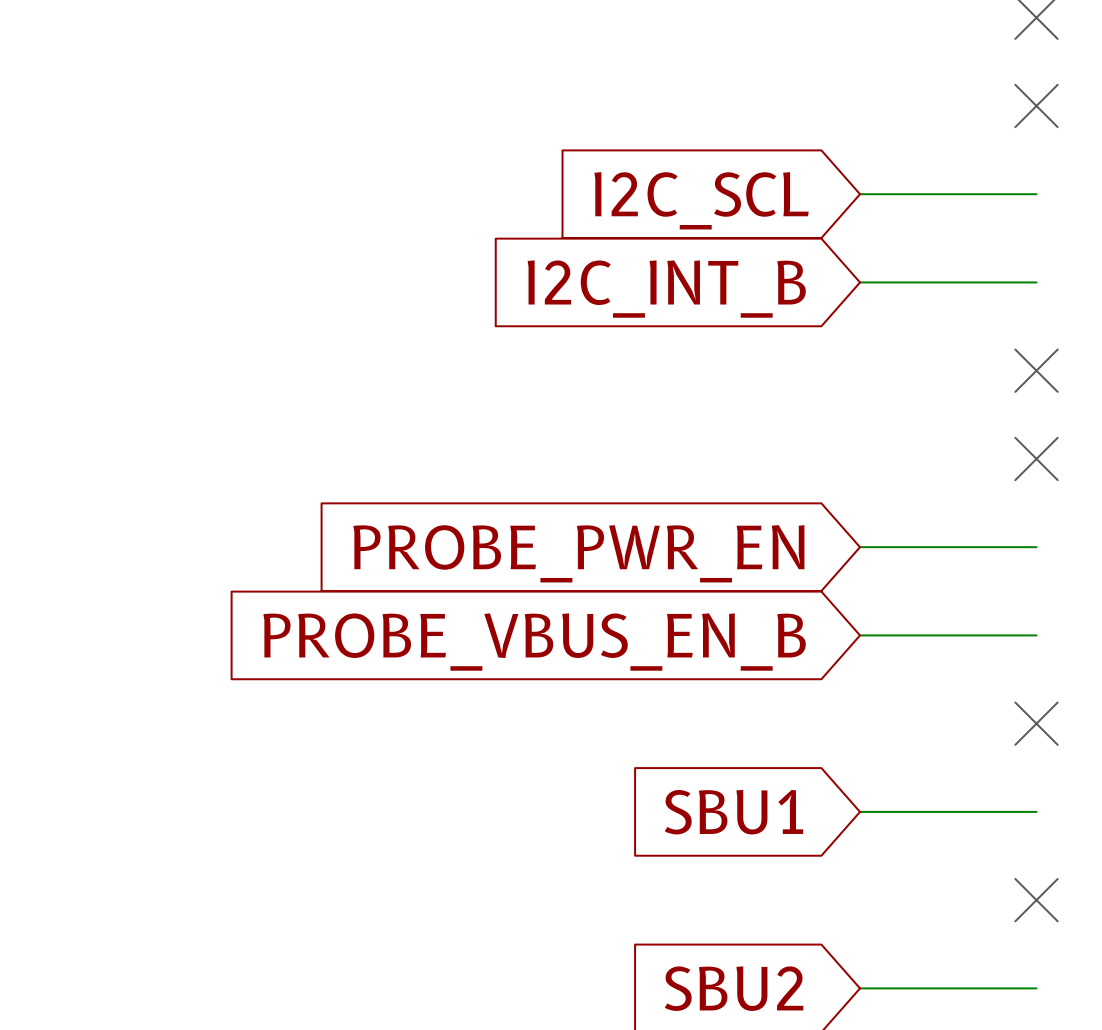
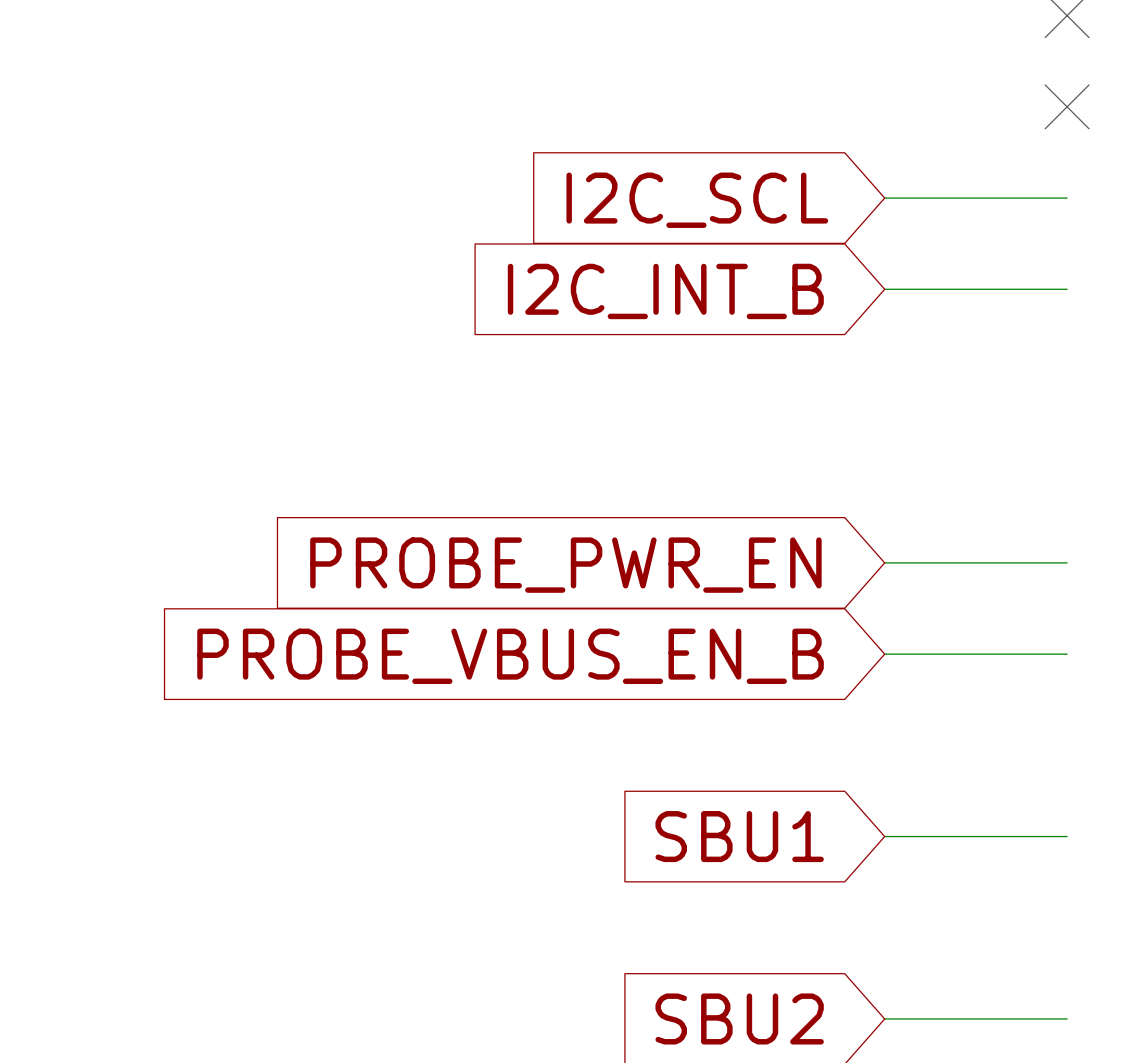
no-connect mark: (1036, 370) -> none
no-connect mark: (1036, 458) -> none
no-connect mark: (1036, 723) -> none
no-connect mark: (1036, 900) -> none

